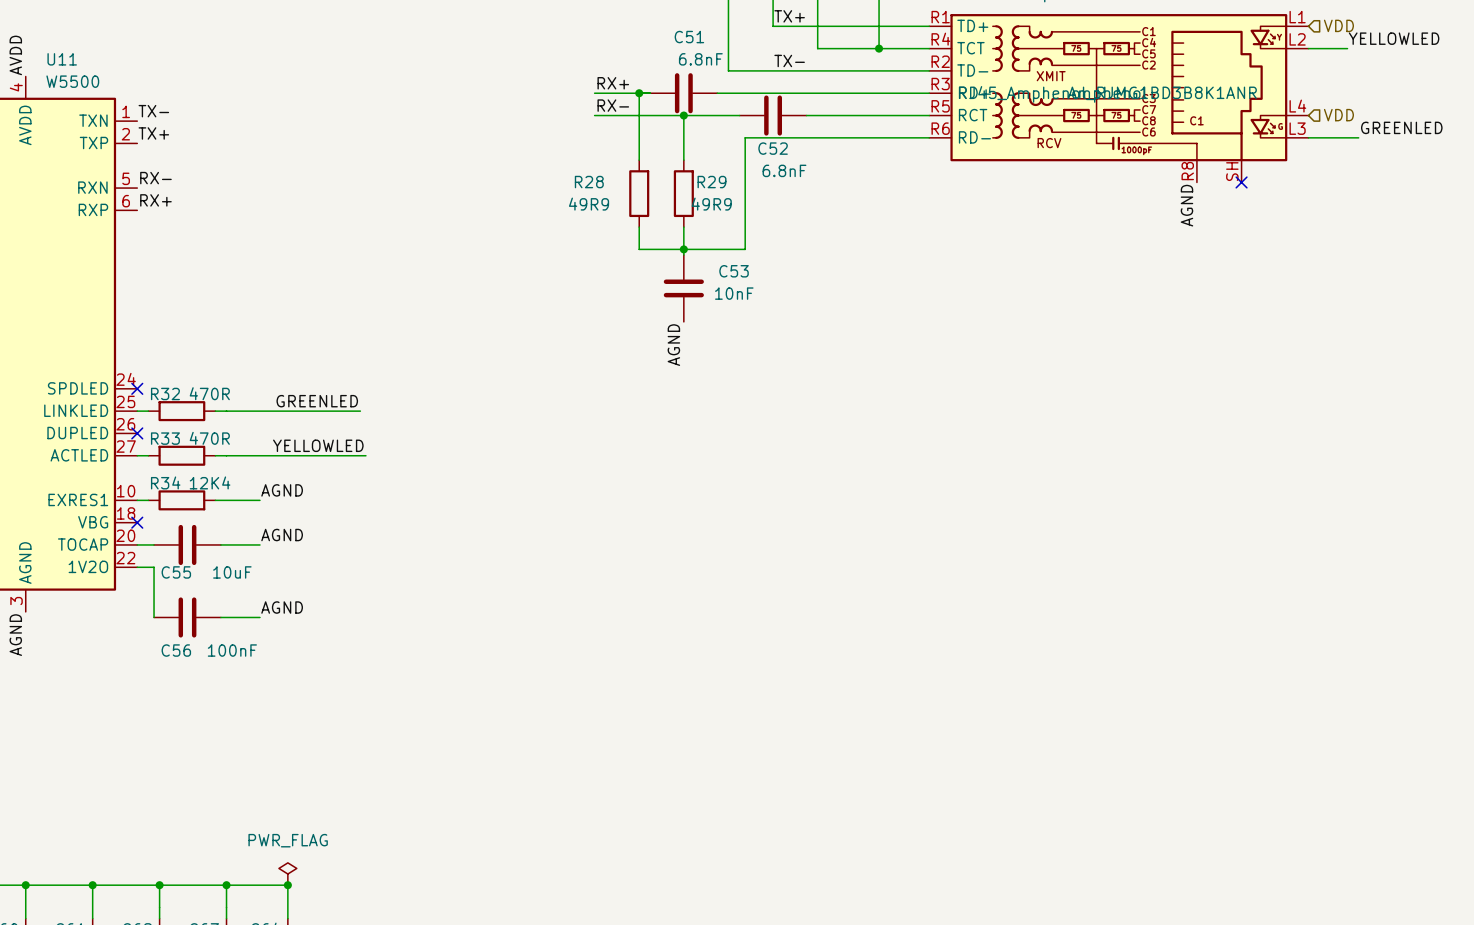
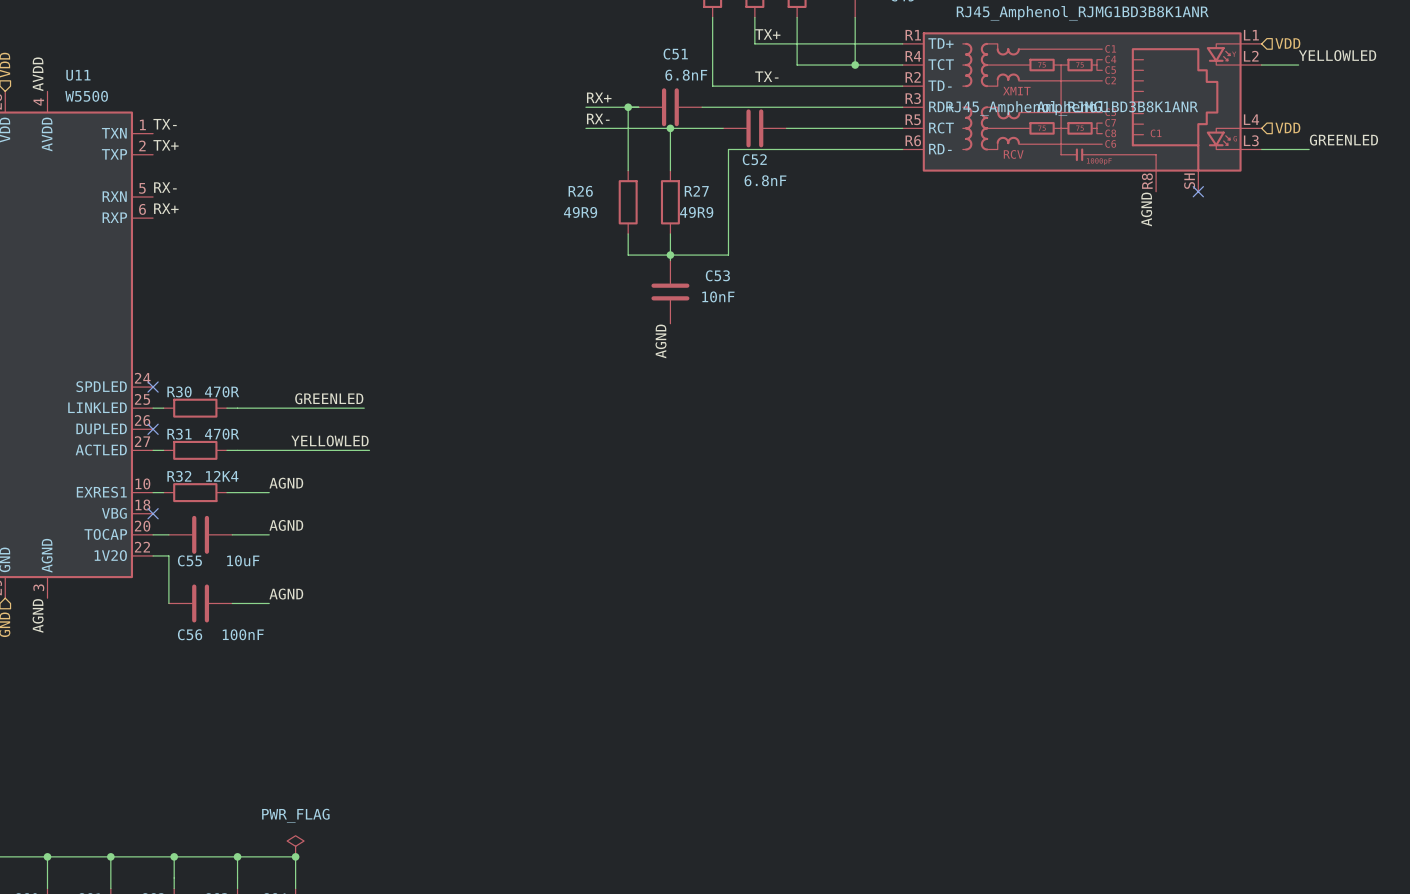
R28 name: R28 (589, 182) -> R26 (580, 191)
R29 name: R29 (711, 182) -> R27 (696, 191)
R32 name: R32 (165, 393) -> R30 (179, 391)
R33 name: R33 (165, 438) -> R31 (179, 434)
R34 name: R34 (165, 482) -> R32 (179, 476)

